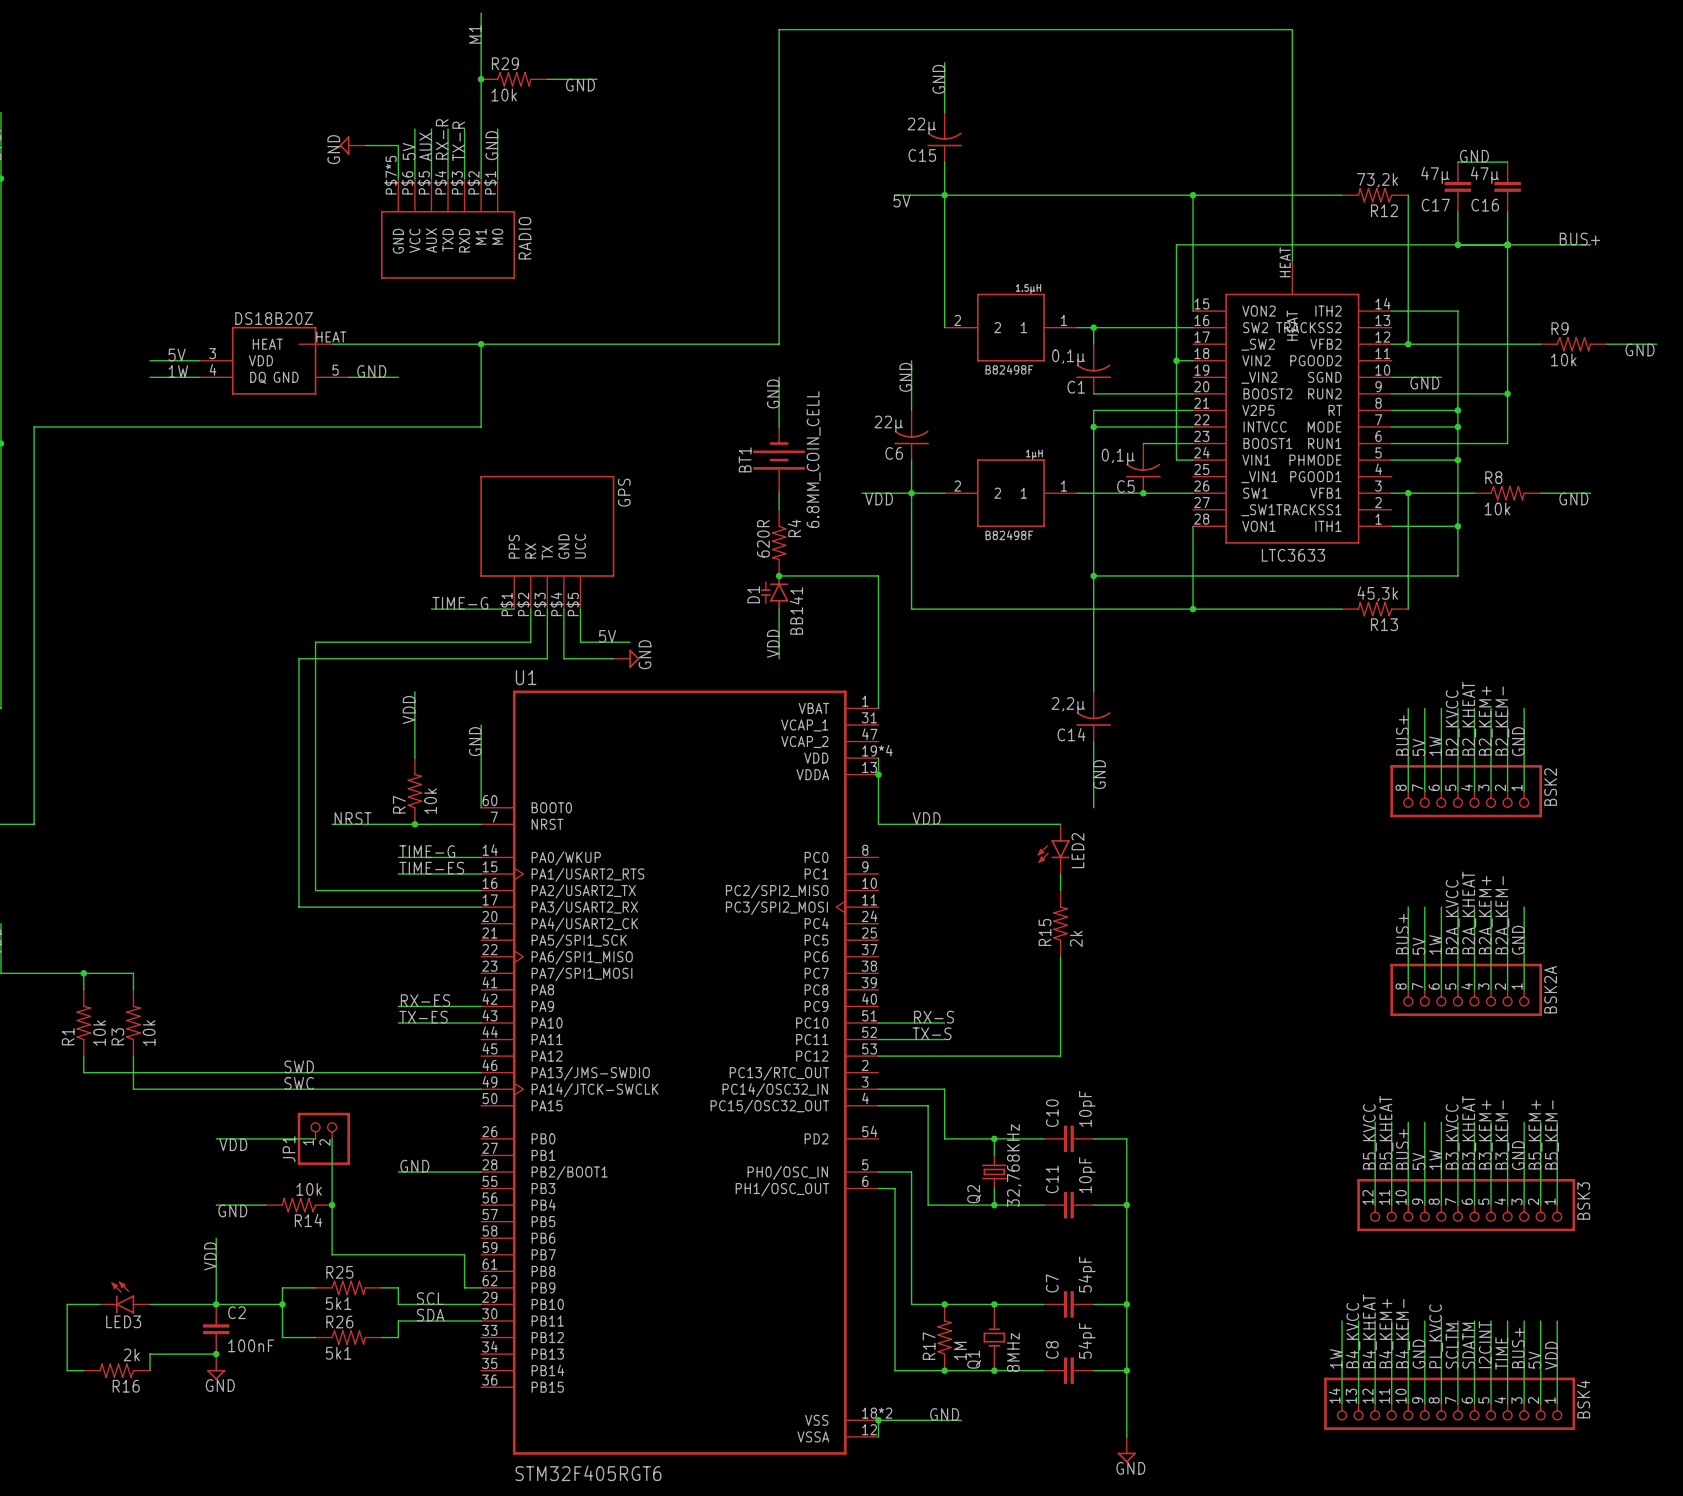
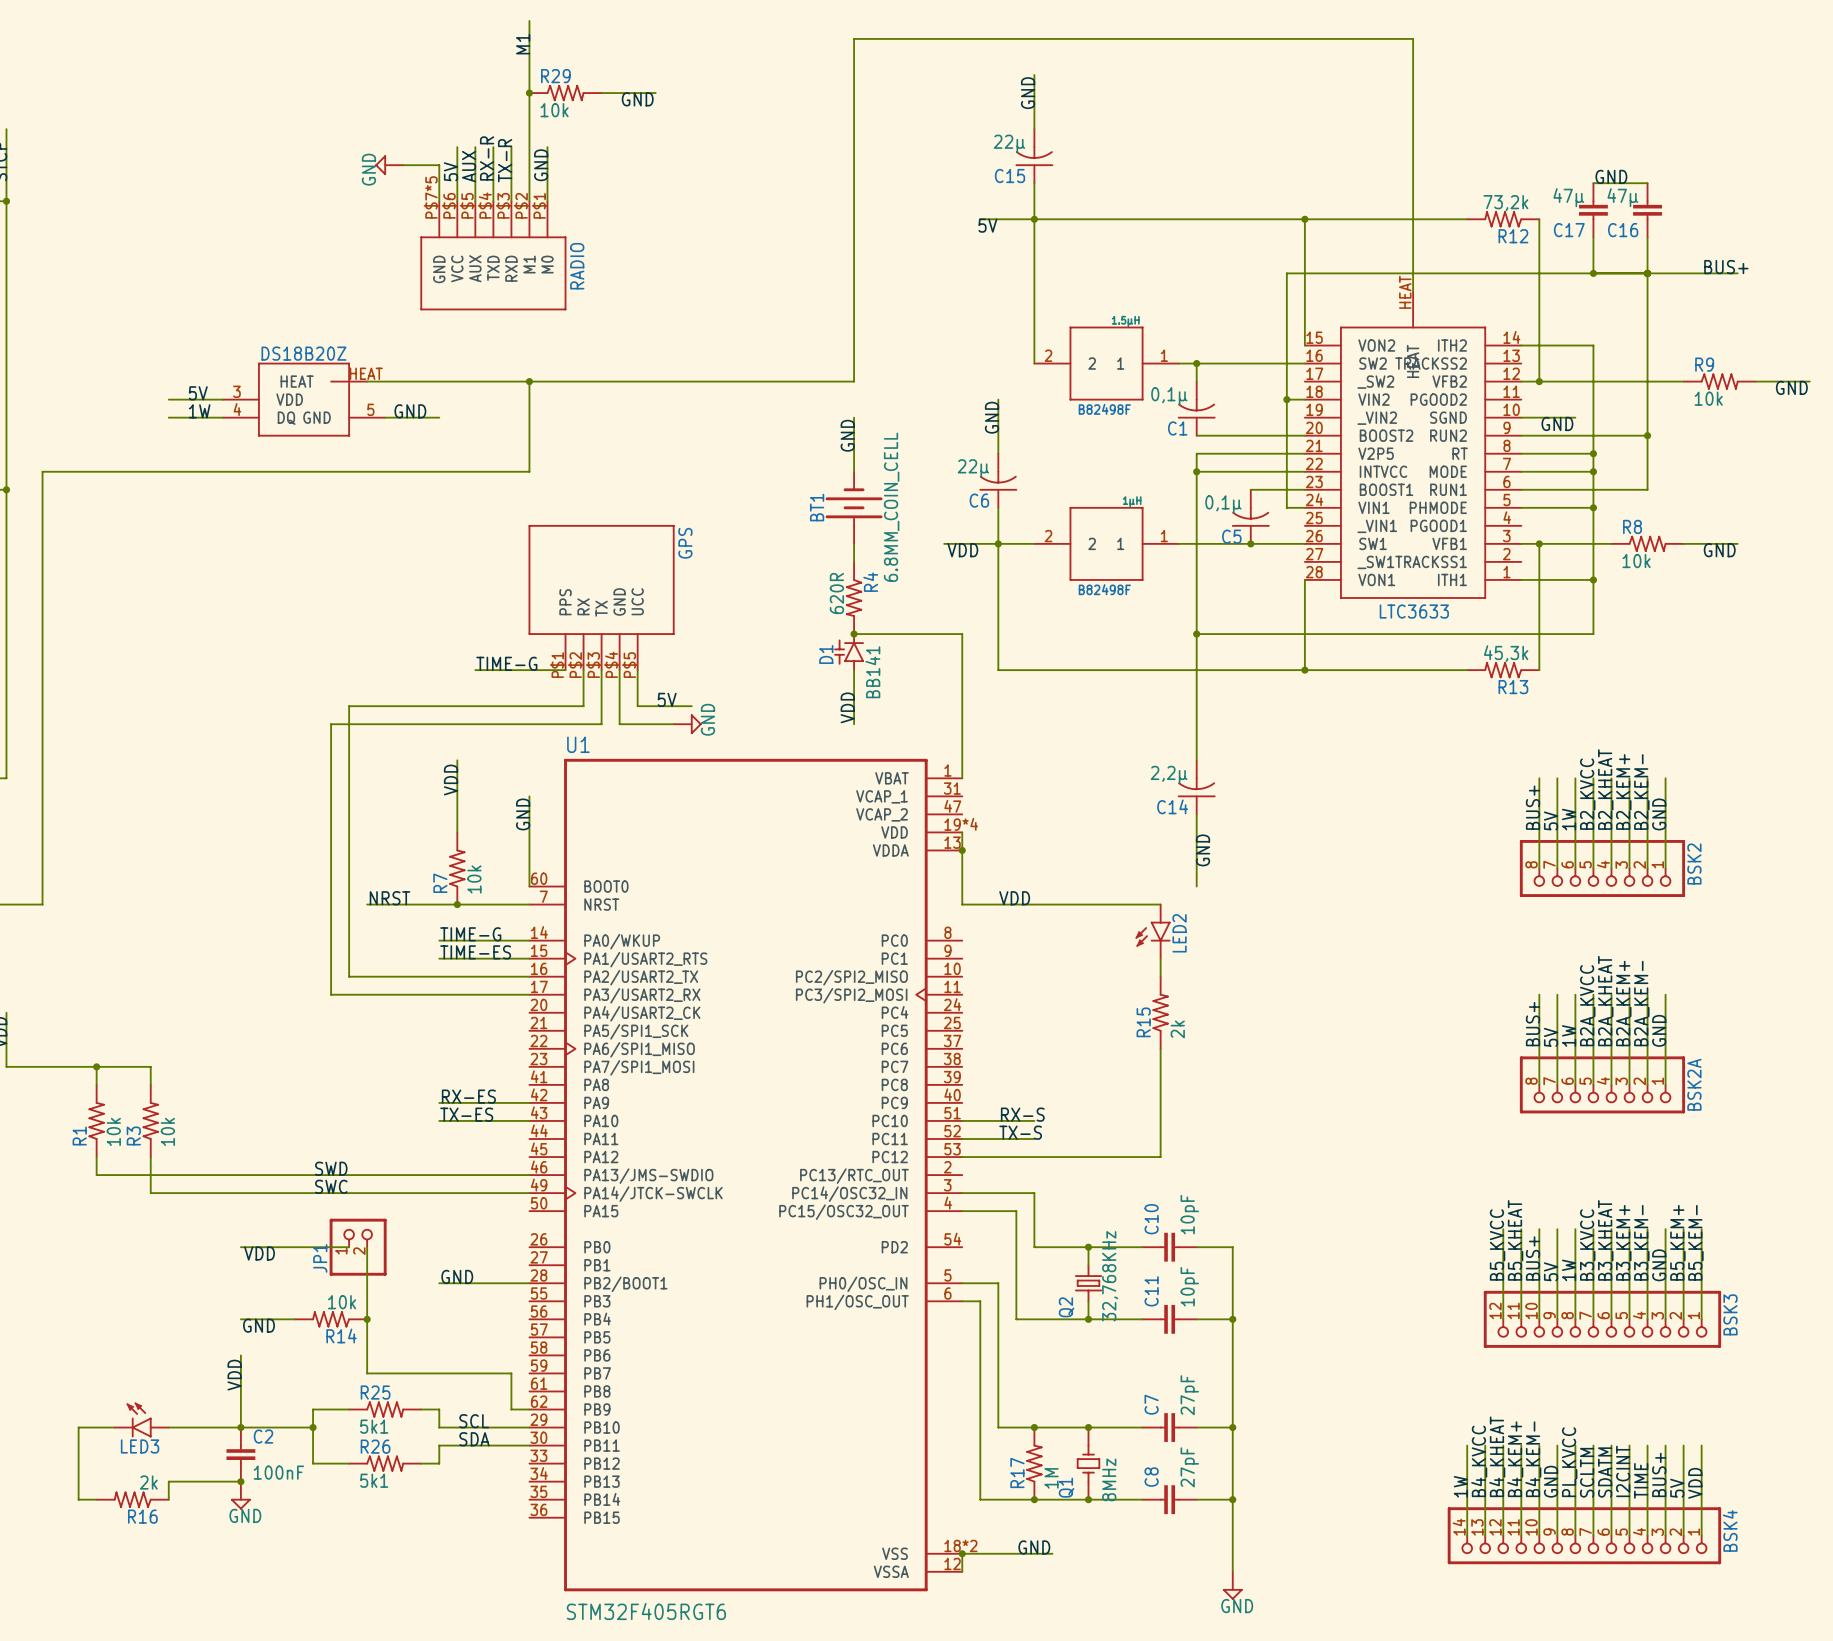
C7 value: 54pF (1087, 1274) -> 27pF (1189, 1395)
C8 value: 54pF (1087, 1340) -> 27pF (1189, 1467)

